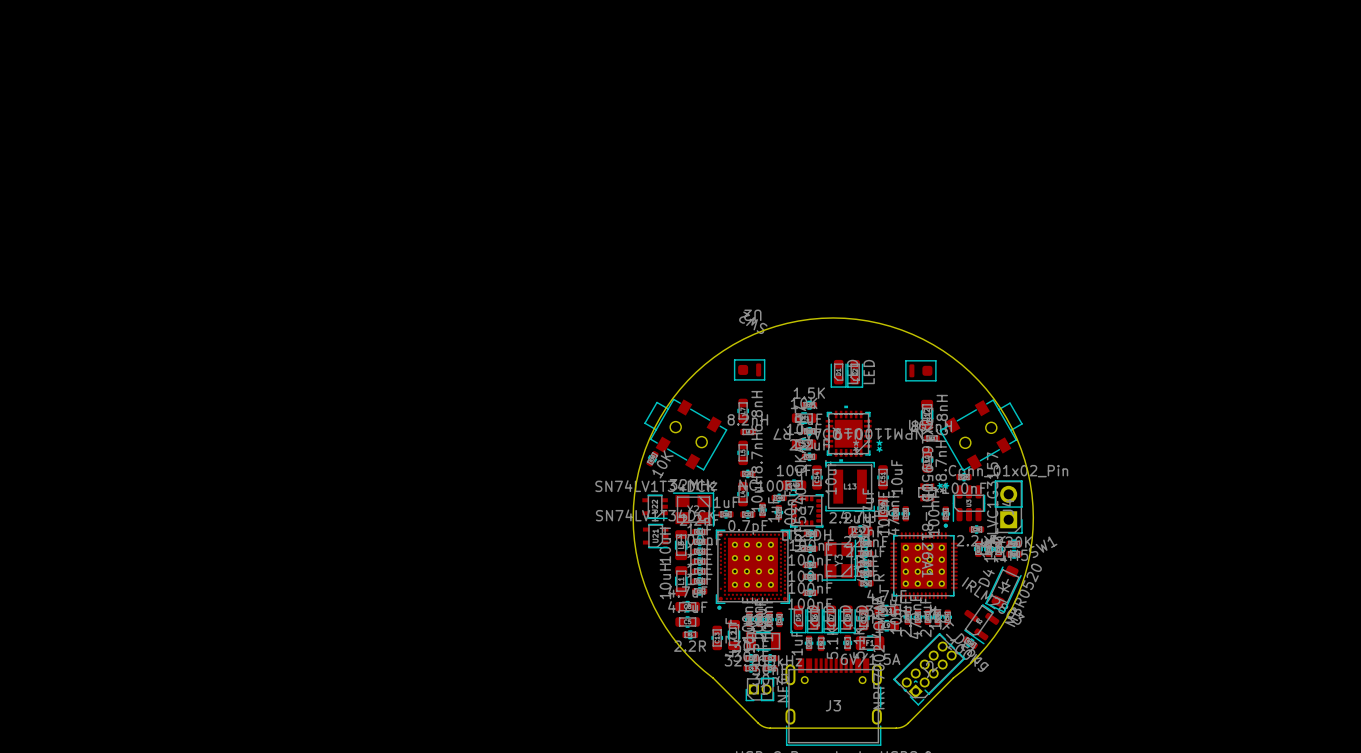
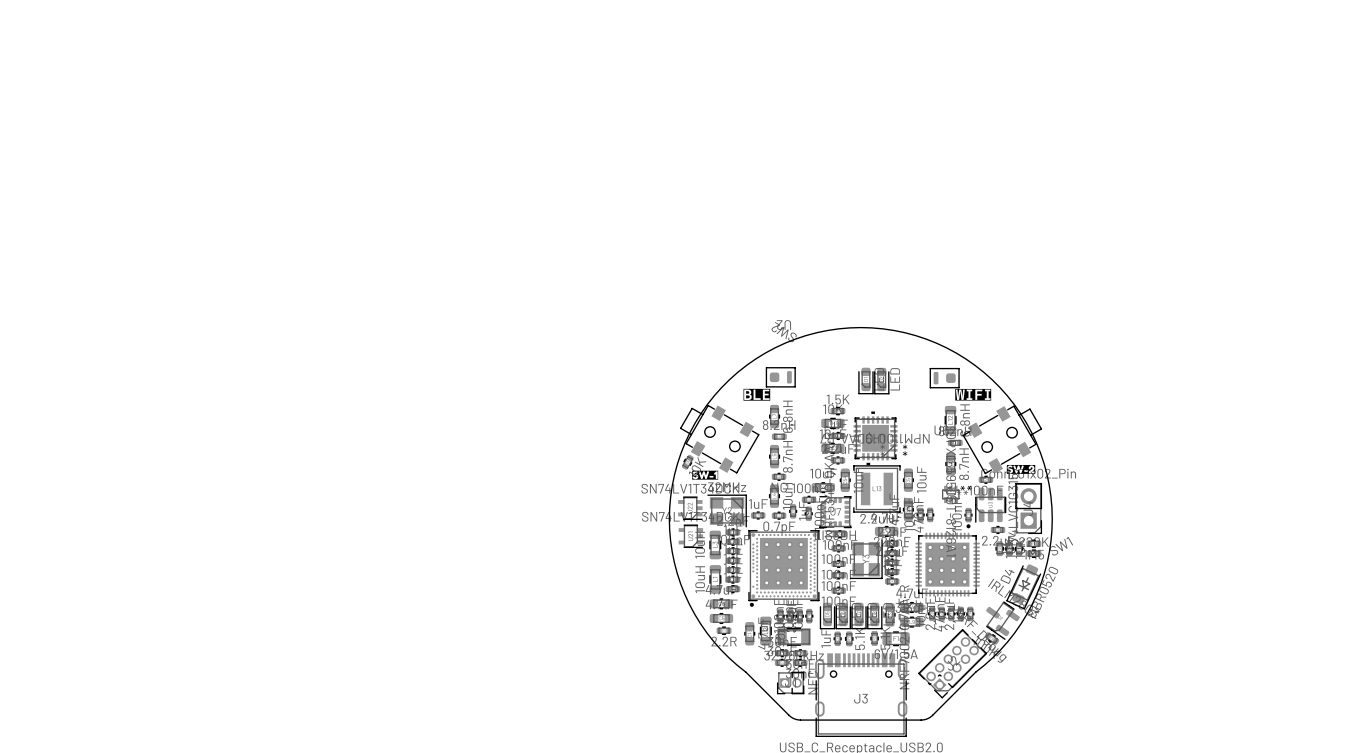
drawing: none -> [743, 388, 771, 401]
drawing: none -> [955, 388, 992, 401]
drawing: none -> [1006, 464, 1036, 474]
drawing: none -> [692, 470, 719, 480]

